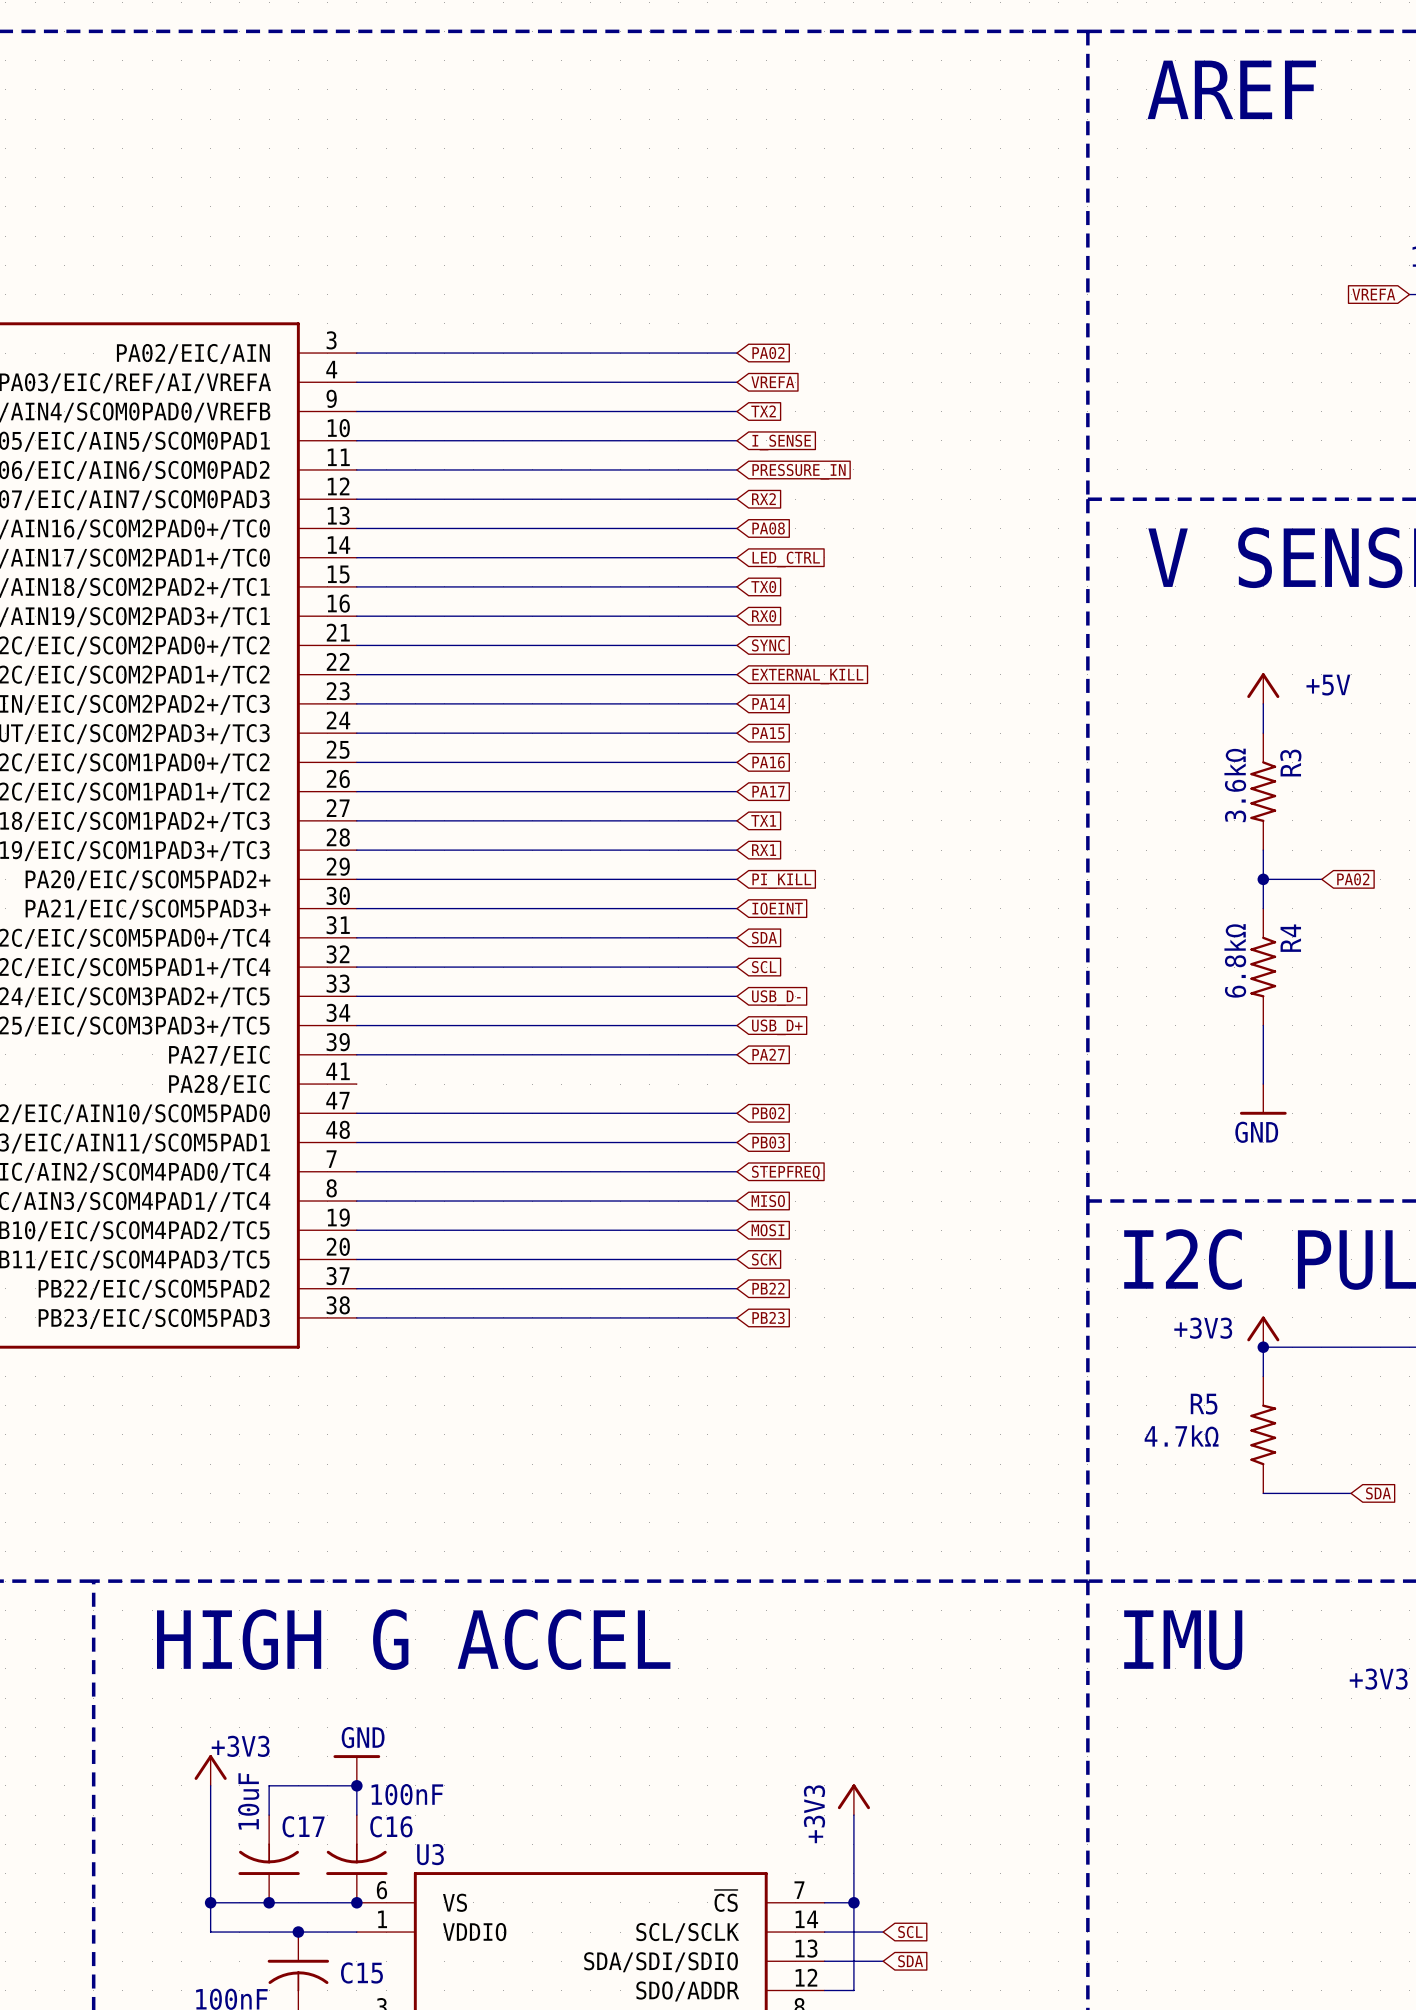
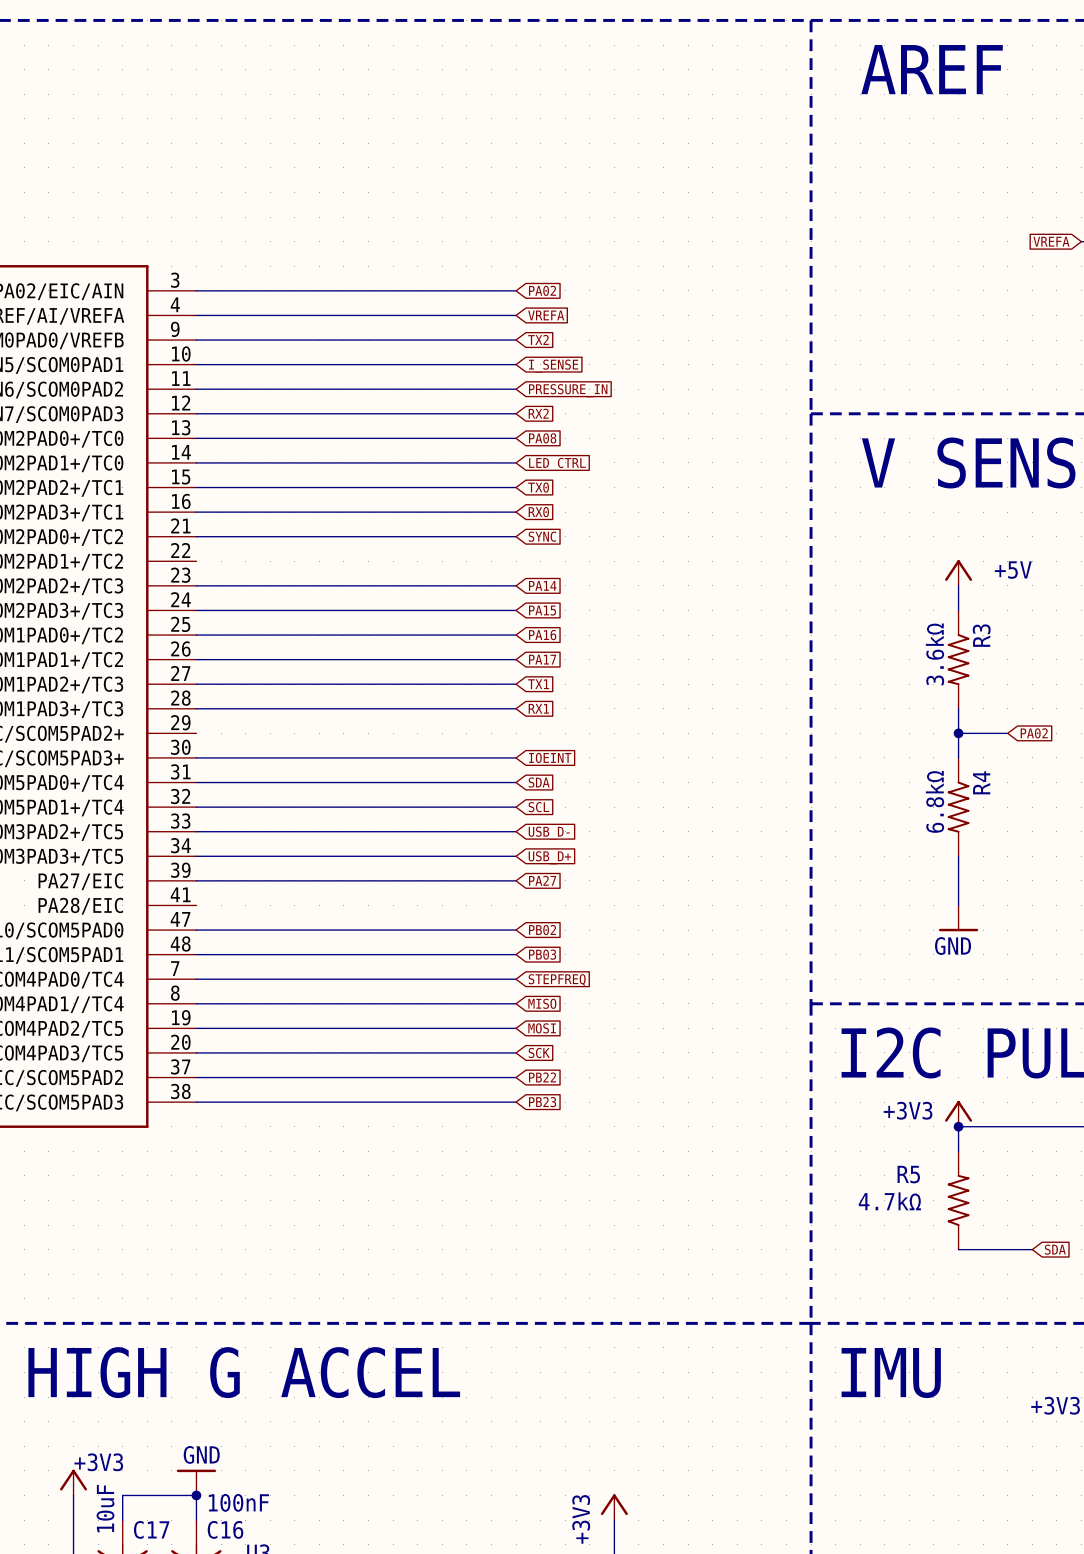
wire: (356, 674) (736, 674) -> none
global label: EXTERNAL_KILL (807, 676) -> none
wire: (356, 879) (736, 879) -> none
global label: PI_KILL (781, 881) -> none

